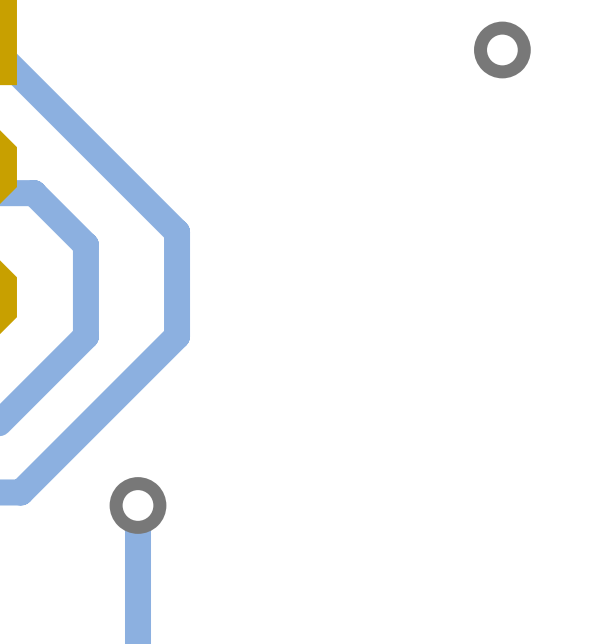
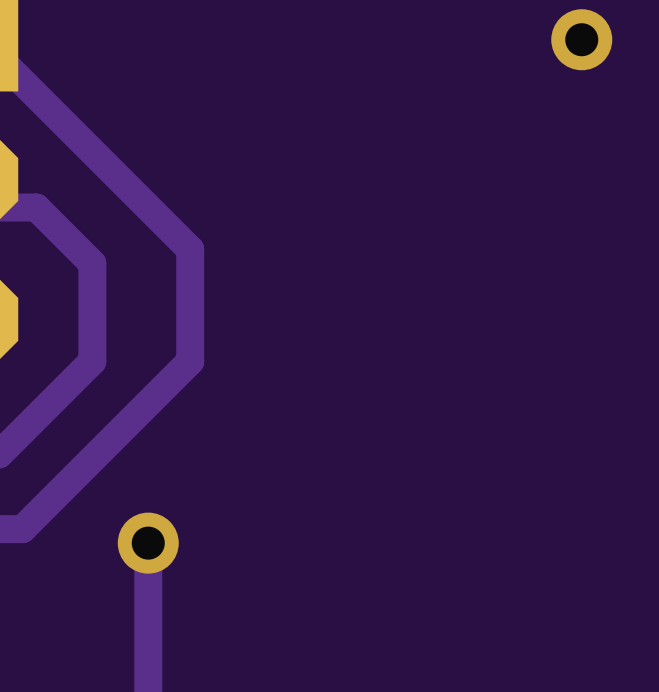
via position: (502, 49) -> (581, 39)

